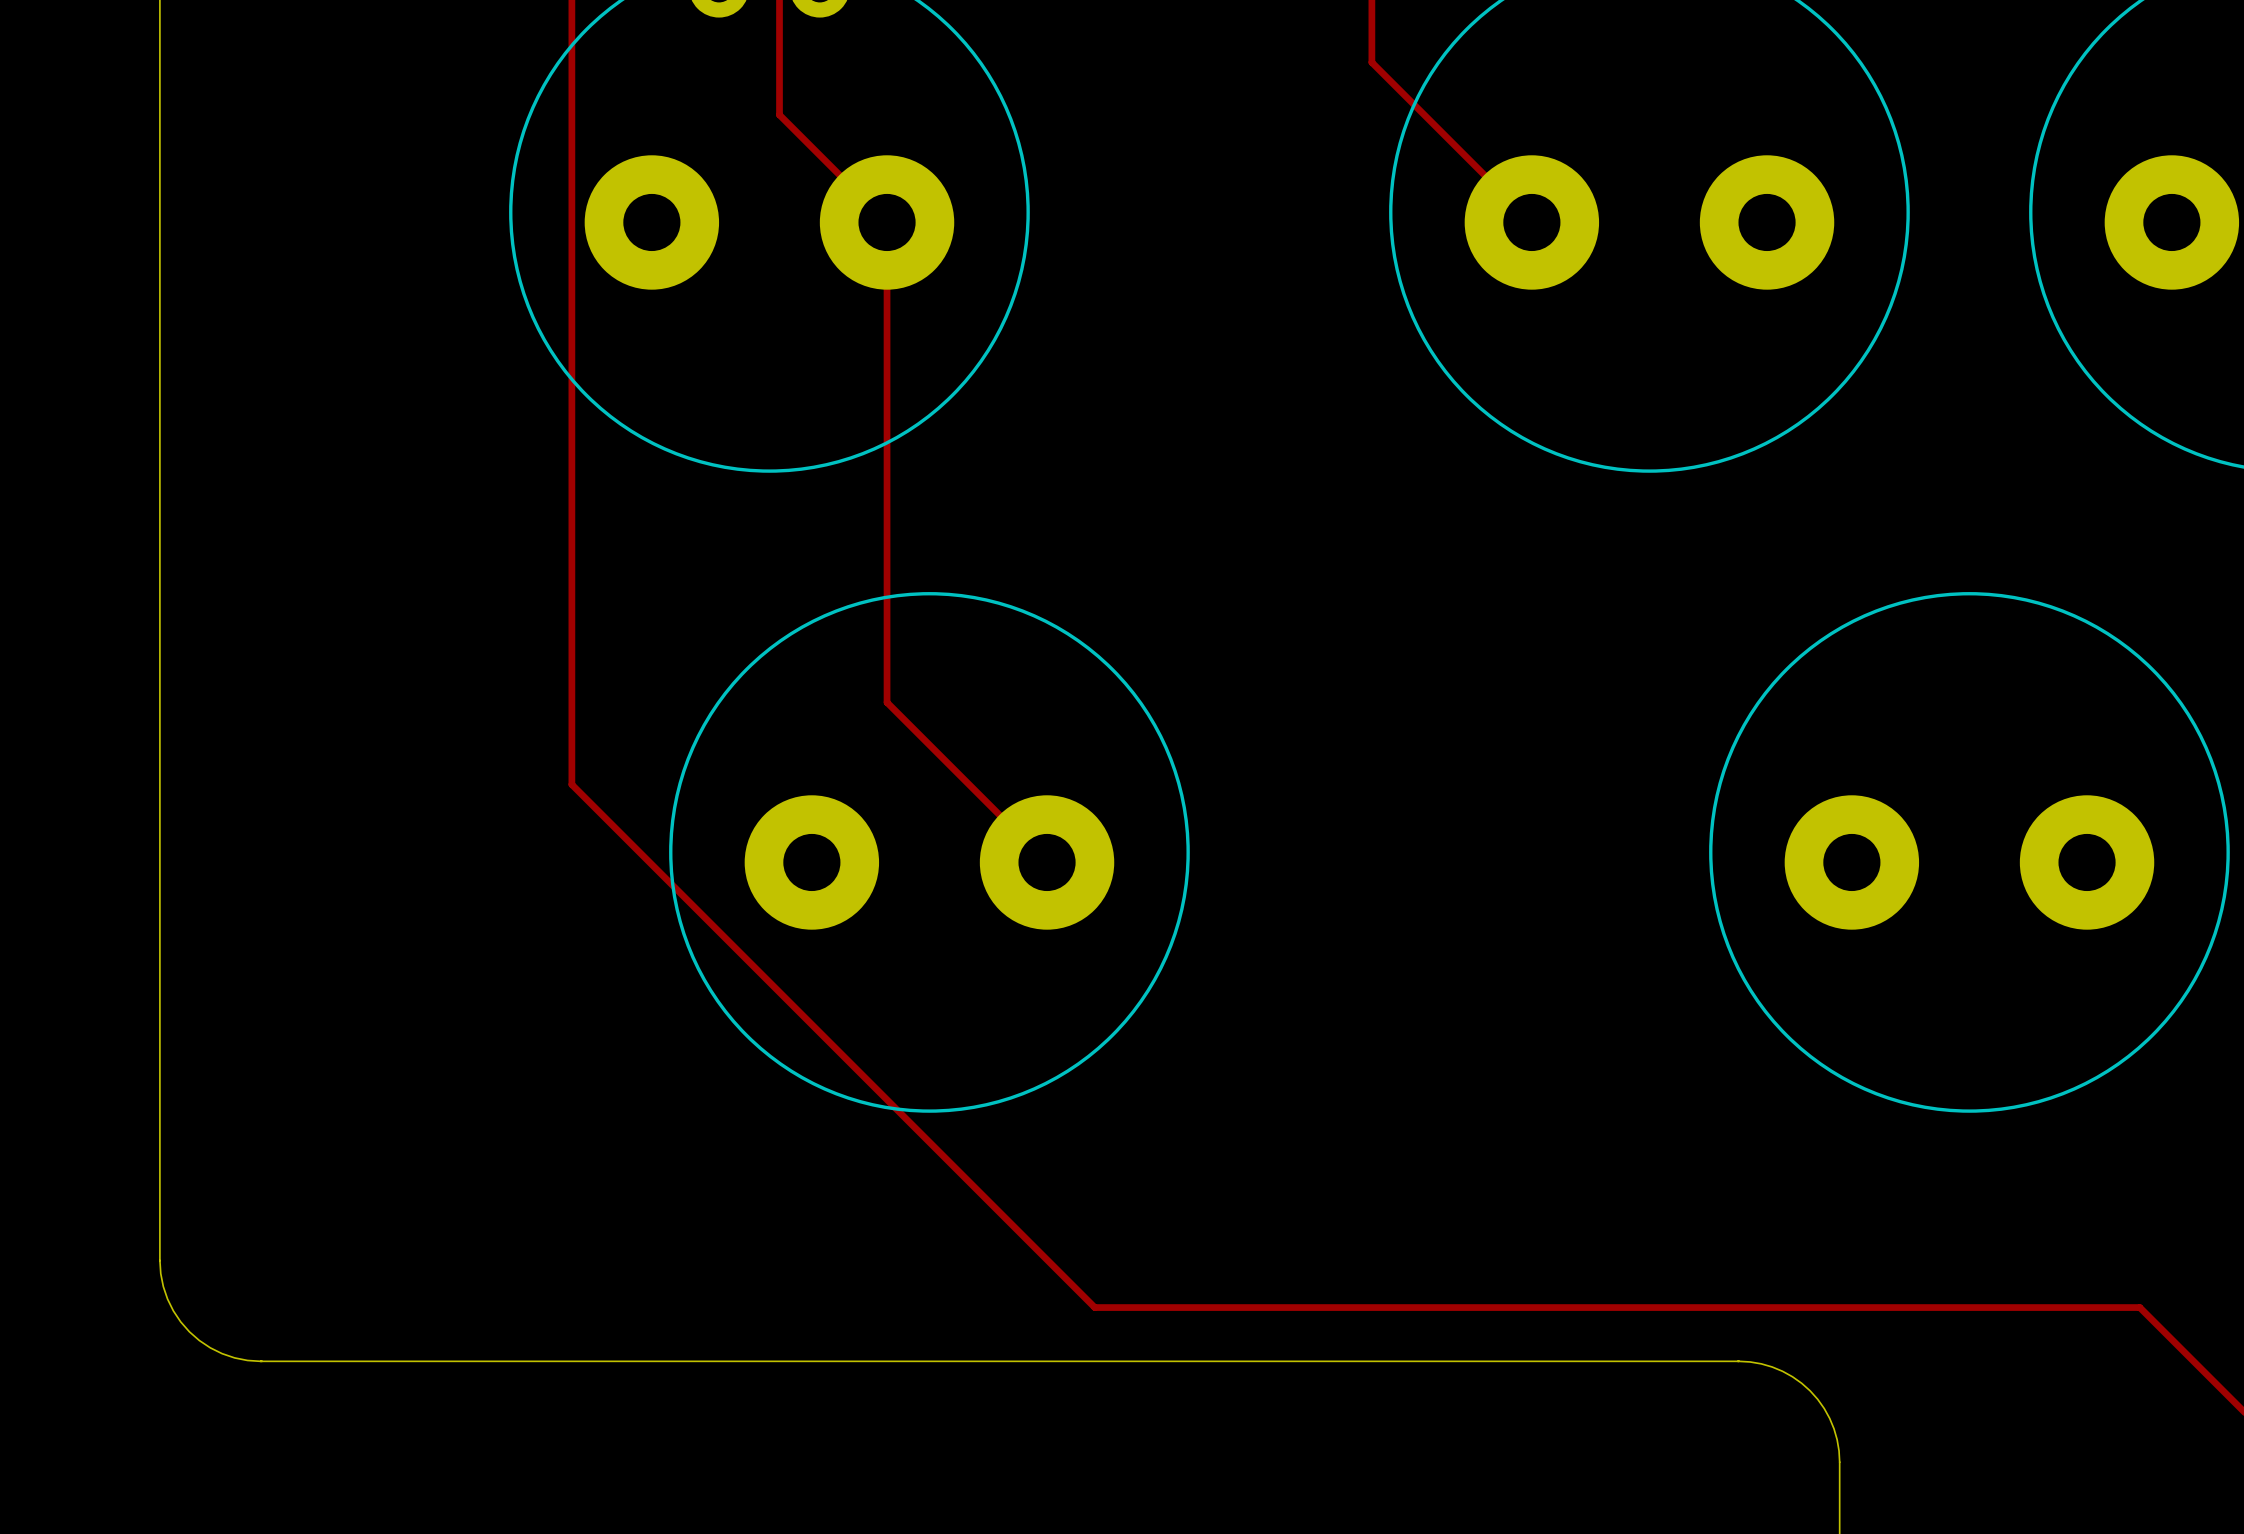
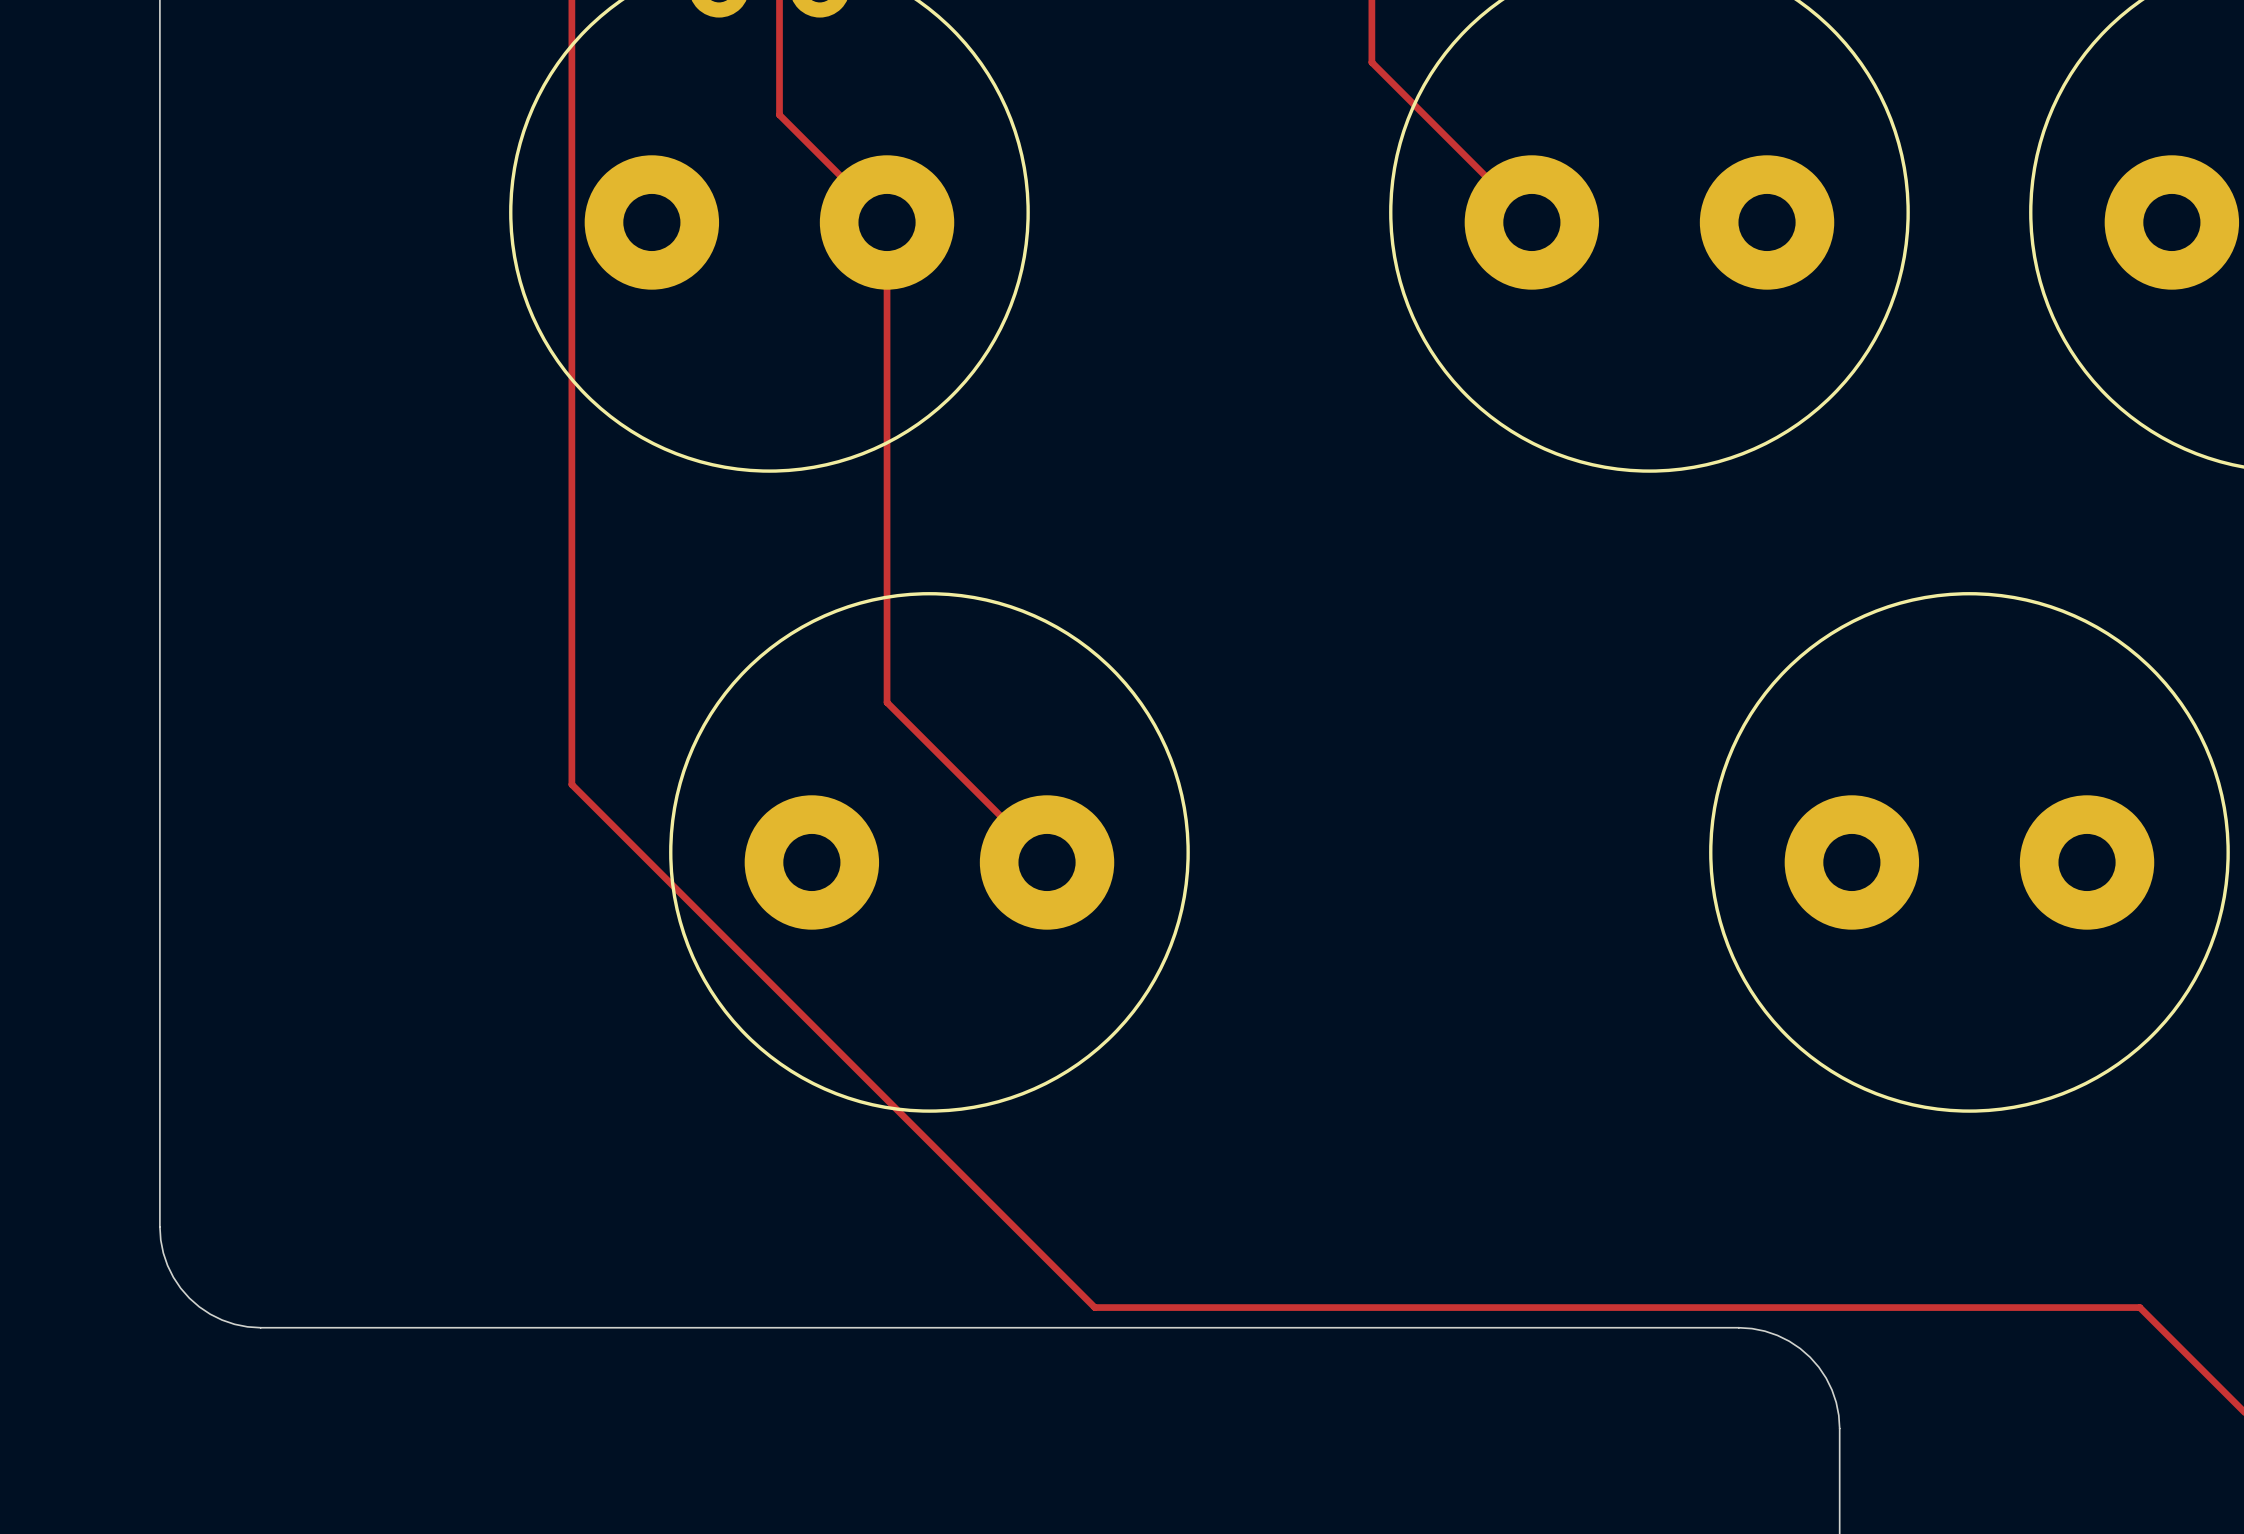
board edge: (159, 1226) (160, 1273) (167, 1299) (173, 1310) (180, 1321) (199, 1340) (222, 1353) (247, 1360) (1750, 1361) (1782, 1371) (1801, 1383) (1817, 1399) (1834, 1428) (1839, 1462) -> (159, 1226) (160, 1240) (167, 1265) (180, 1288) (189, 1298) (199, 1306) (222, 1320) (247, 1326) (260, 1327) (1752, 1328) (1777, 1335) (1800, 1348) (1818, 1367) (1826, 1378) (1836, 1402) (1838, 1415) (1839, 1462)

